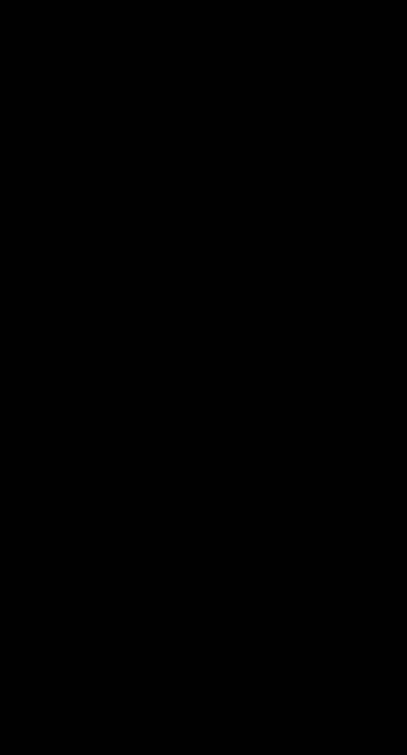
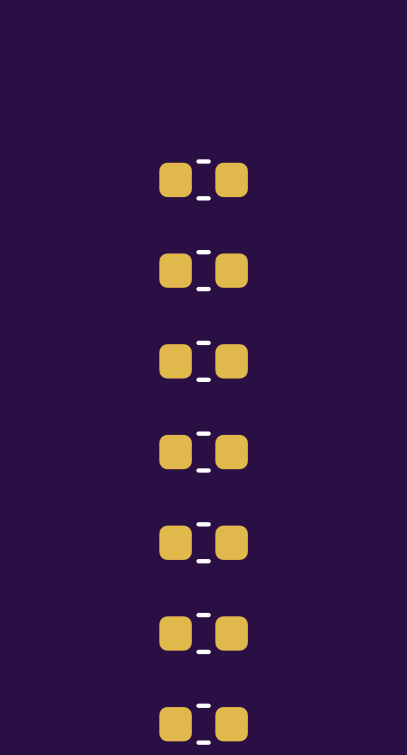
part: none -> (203, 179)
part: none -> (203, 270)
part: none -> (203, 361)
part: none -> (203, 452)
part: none -> (203, 542)
part: none -> (203, 633)
part: none -> (203, 724)

